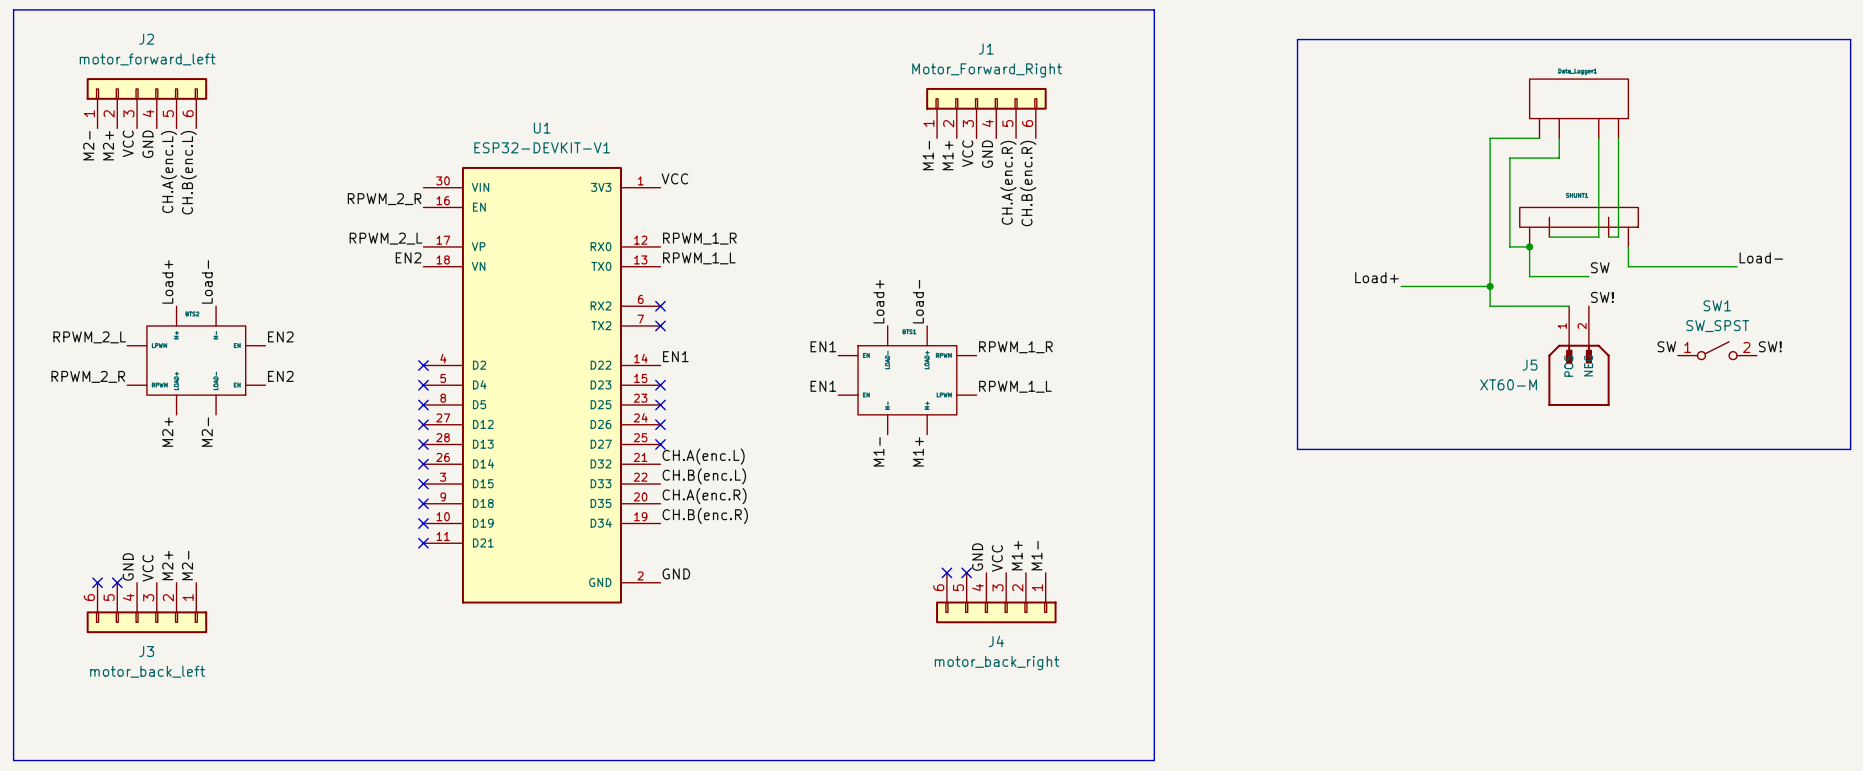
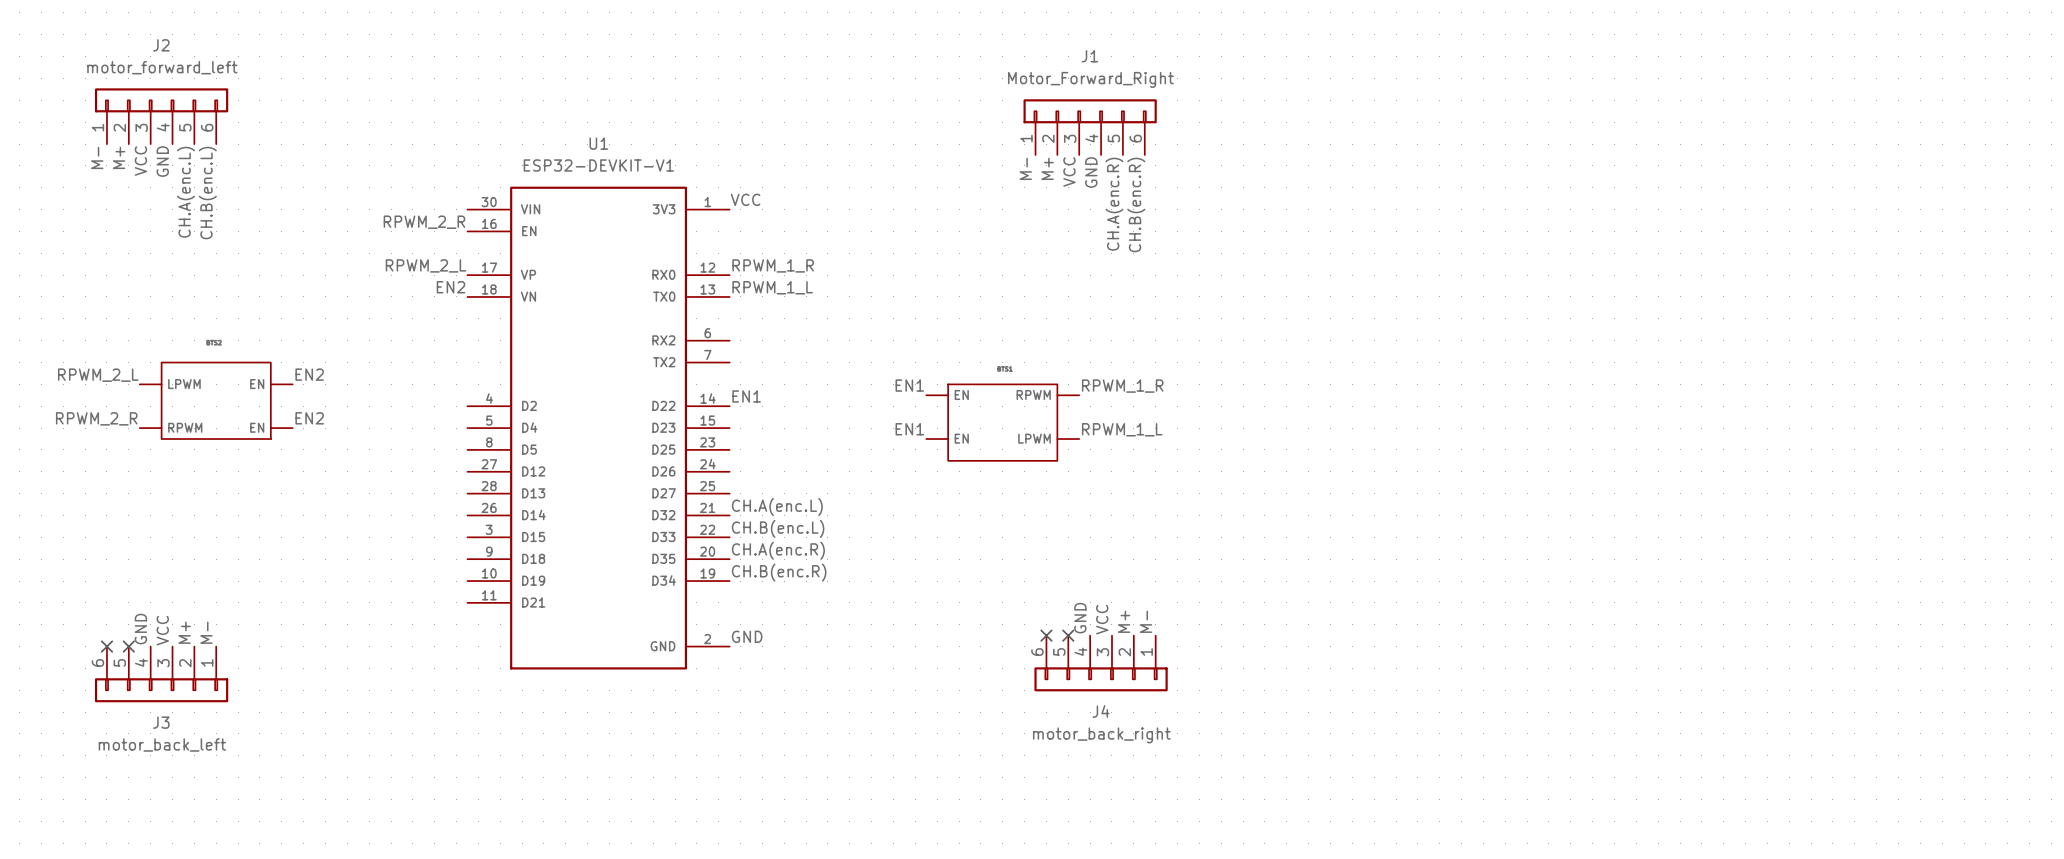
line: (13, 9) (1154, 9) (1154, 760) (13, 760) (13, 9) -> none
line: (1297, 39) (1850, 39) (1850, 449) (1297, 449) (1297, 39) -> none
part: (1579, 108) -> none
wire: (1539, 138) (1490, 138) (1490, 306) (1569, 306) -> none
wire: (1559, 138) (1559, 158) (1509, 158) (1509, 246) (1529, 246) (1529, 276) (1588, 276) -> none
wire: (1598, 138) (1598, 237) (1549, 237) -> none
wire: (1618, 138) (1618, 237) (1608, 237) -> none
label: M2- (88, 145) -> M- (97, 157)
label: M2+ (108, 145) -> M+ (119, 157)
label: M1- (928, 155) -> M- (1025, 168)
label: M1+ (947, 155) -> M+ (1047, 168)
part: (1579, 227) -> none
junction: (1529, 246) -> none
wire: (1628, 246) (1628, 266) (1737, 266) -> none
label: Load- (1761, 257) -> none
label: SW (1600, 267) -> none
label: Load+ (1376, 277) -> none
label: Load+ (167, 281) -> none
label: Load- (207, 281) -> none
wire: (1401, 286) (1490, 286) -> none
junction: (1490, 286) -> none
label: SW! (1602, 297) -> none
label: Load+ (878, 301) -> none
label: Load- (918, 301) -> none
part symbol: [127, 306, 266, 415] -> [139, 362, 293, 440]
no-connect mark: (660, 306) -> none
no-connect mark: (660, 325) -> none
part symbol: [838, 325, 977, 435] -> [926, 384, 1080, 461]
label: SW (1666, 346) -> none
label: SW! (1770, 346) -> none
SW1: SW_SPST (1717, 350) -> none
J5: XT60-M (1579, 356) -> none
no-connect mark: (423, 365) -> none
no-connect mark: (423, 385) -> none
no-connect mark: (660, 385) -> none
no-connect mark: (423, 404) -> none
no-connect mark: (660, 404) -> none
no-connect mark: (423, 424) -> none
no-connect mark: (660, 424) -> none
label: M2+ (167, 432) -> none
label: M2- (207, 432) -> none
no-connect mark: (423, 444) -> none
no-connect mark: (660, 444) -> none
label: M1- (878, 451) -> none
label: M1+ (918, 451) -> none
no-connect mark: (423, 464) -> none
no-connect mark: (423, 484) -> none
no-connect mark: (423, 503) -> none
no-connect mark: (423, 523) -> none
no-connect mark: (423, 543) -> none
label: M1+ (1017, 555) -> M+ (1124, 621)
label: M1- (1036, 555) -> M- (1145, 621)
label: M2+ (167, 565) -> M+ (184, 632)
label: M2- (187, 565) -> M- (206, 632)

